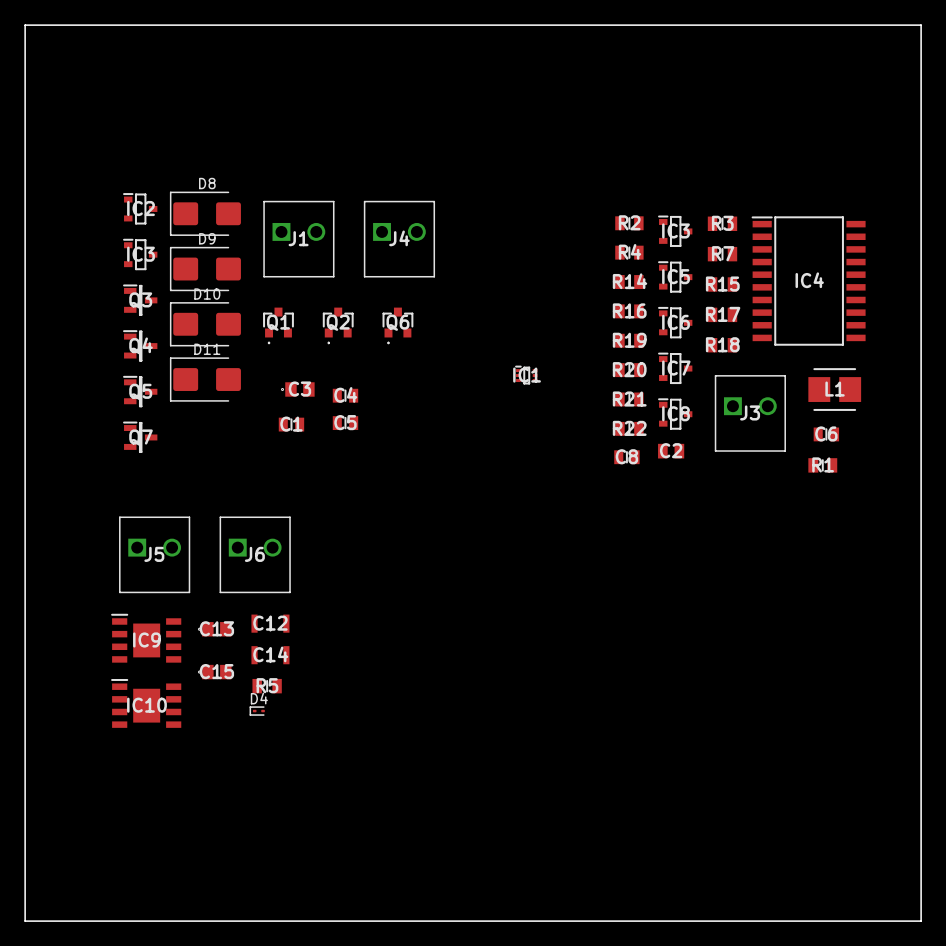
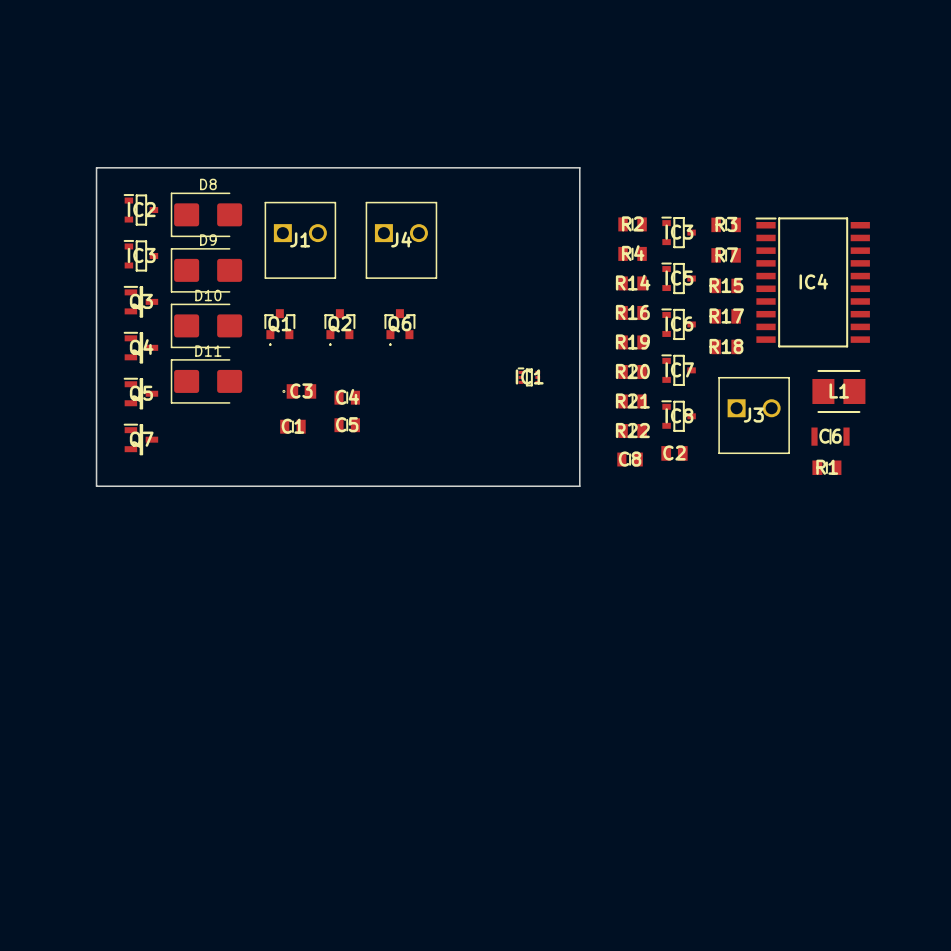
board edge: (25, 25) (921, 25) (921, 921) (25, 921) (25, 25) -> none
board edge: none -> (96, 167) (579, 167) (579, 486) (96, 486) (96, 167)
C6 footprint: [813, 427, 840, 442] -> [811, 427, 850, 446]
J5: (154, 554) -> none
J6: (255, 554) -> none
C12: (270, 623) -> none
C13: (214, 629) -> none
IC9: (146, 638) -> none
C14: (270, 655) -> none
C15: (214, 672) -> none
R5: (267, 686) -> none
IC10: (146, 703) -> none
D4: (257, 711) -> none

